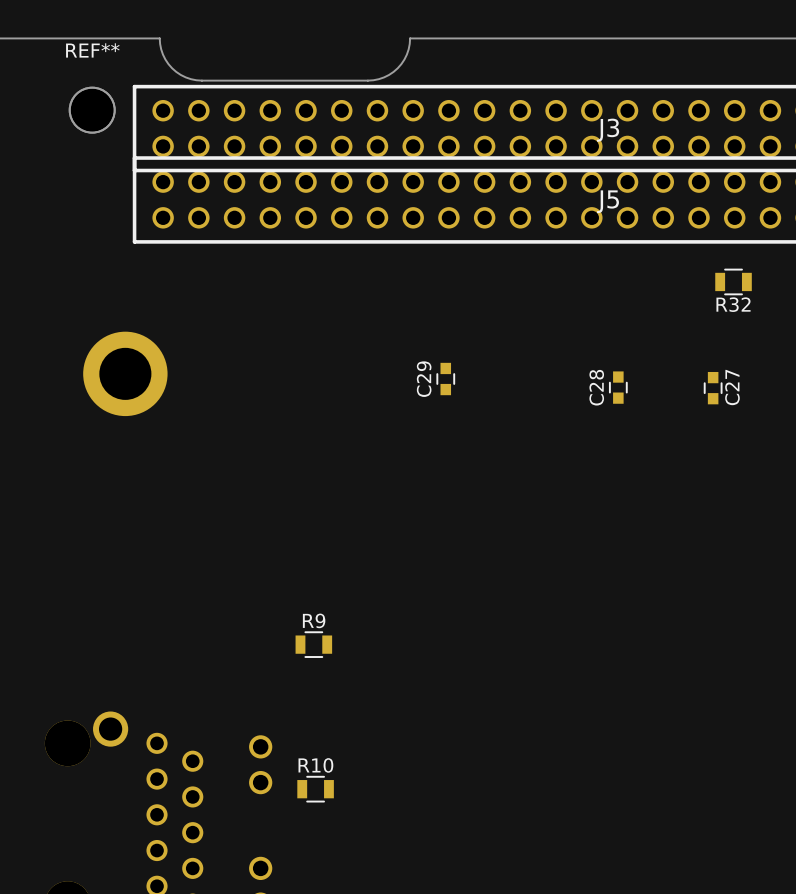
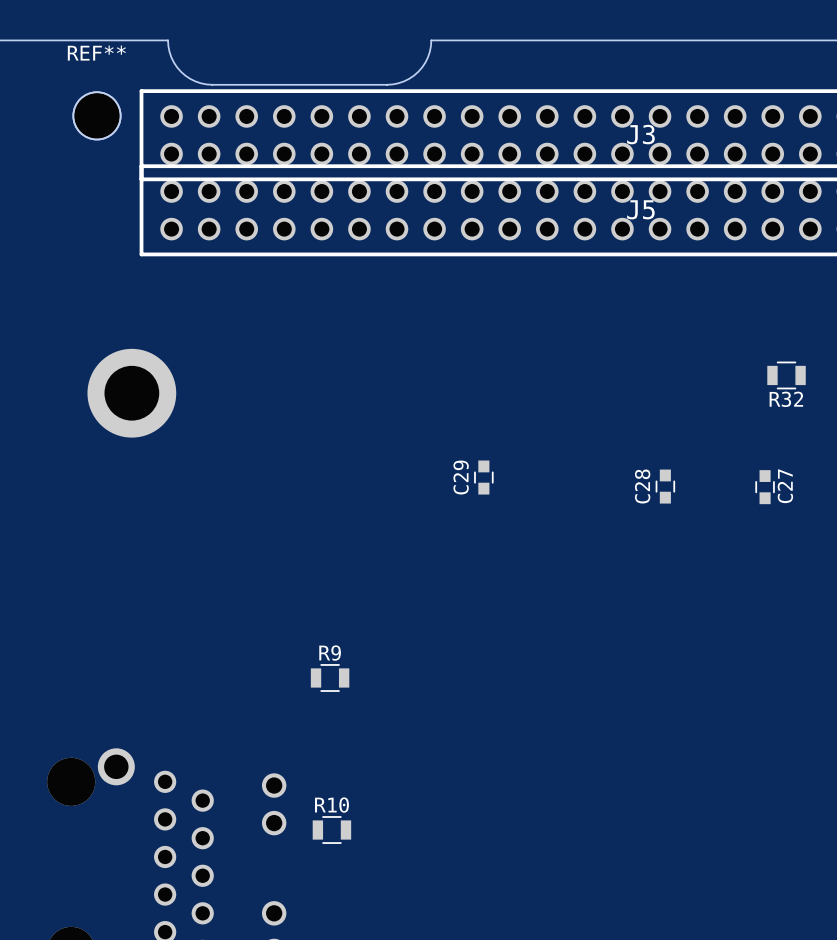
R32 position: (733, 281) -> (786, 375)
C29 position: (445, 379) -> (483, 477)
C28 position: (618, 387) -> (665, 486)
C27 position: (713, 388) -> (765, 487)

